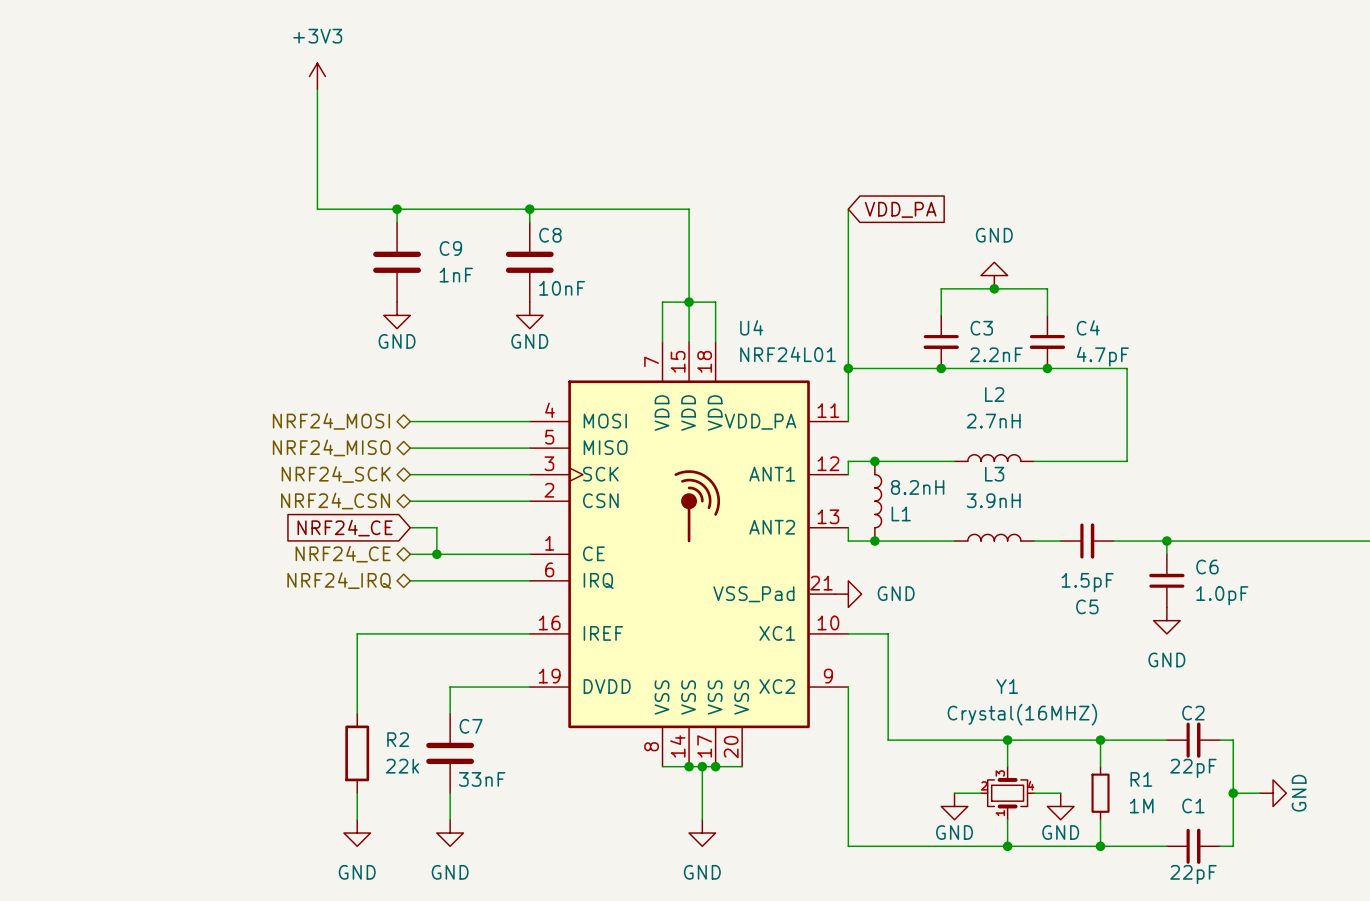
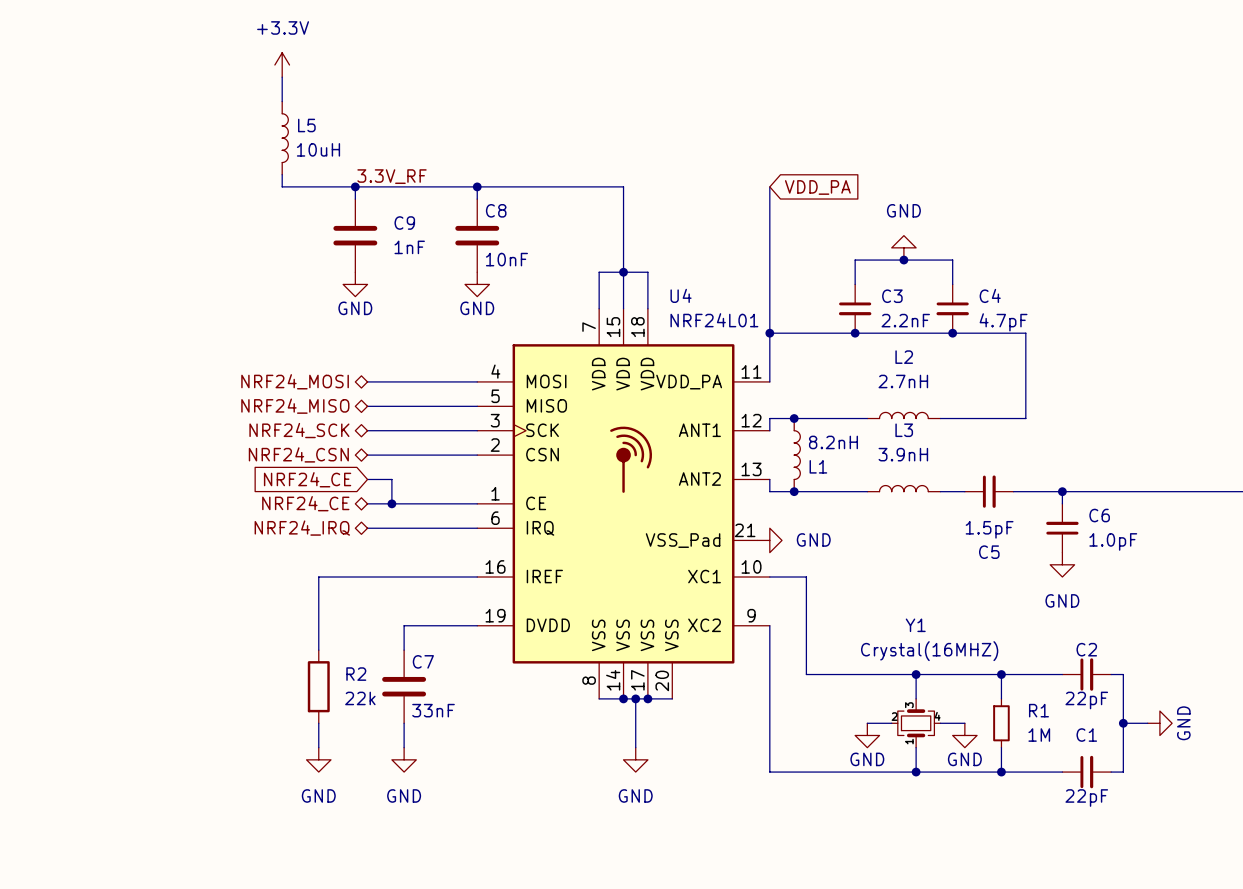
power symbol: +3V3 (317, 76) -> +3.3V (282, 64)
wire: (317, 116) (317, 195) -> none
L5: none -> 10uH (285, 138)
label: none -> 3.3V_RF (392, 176)

